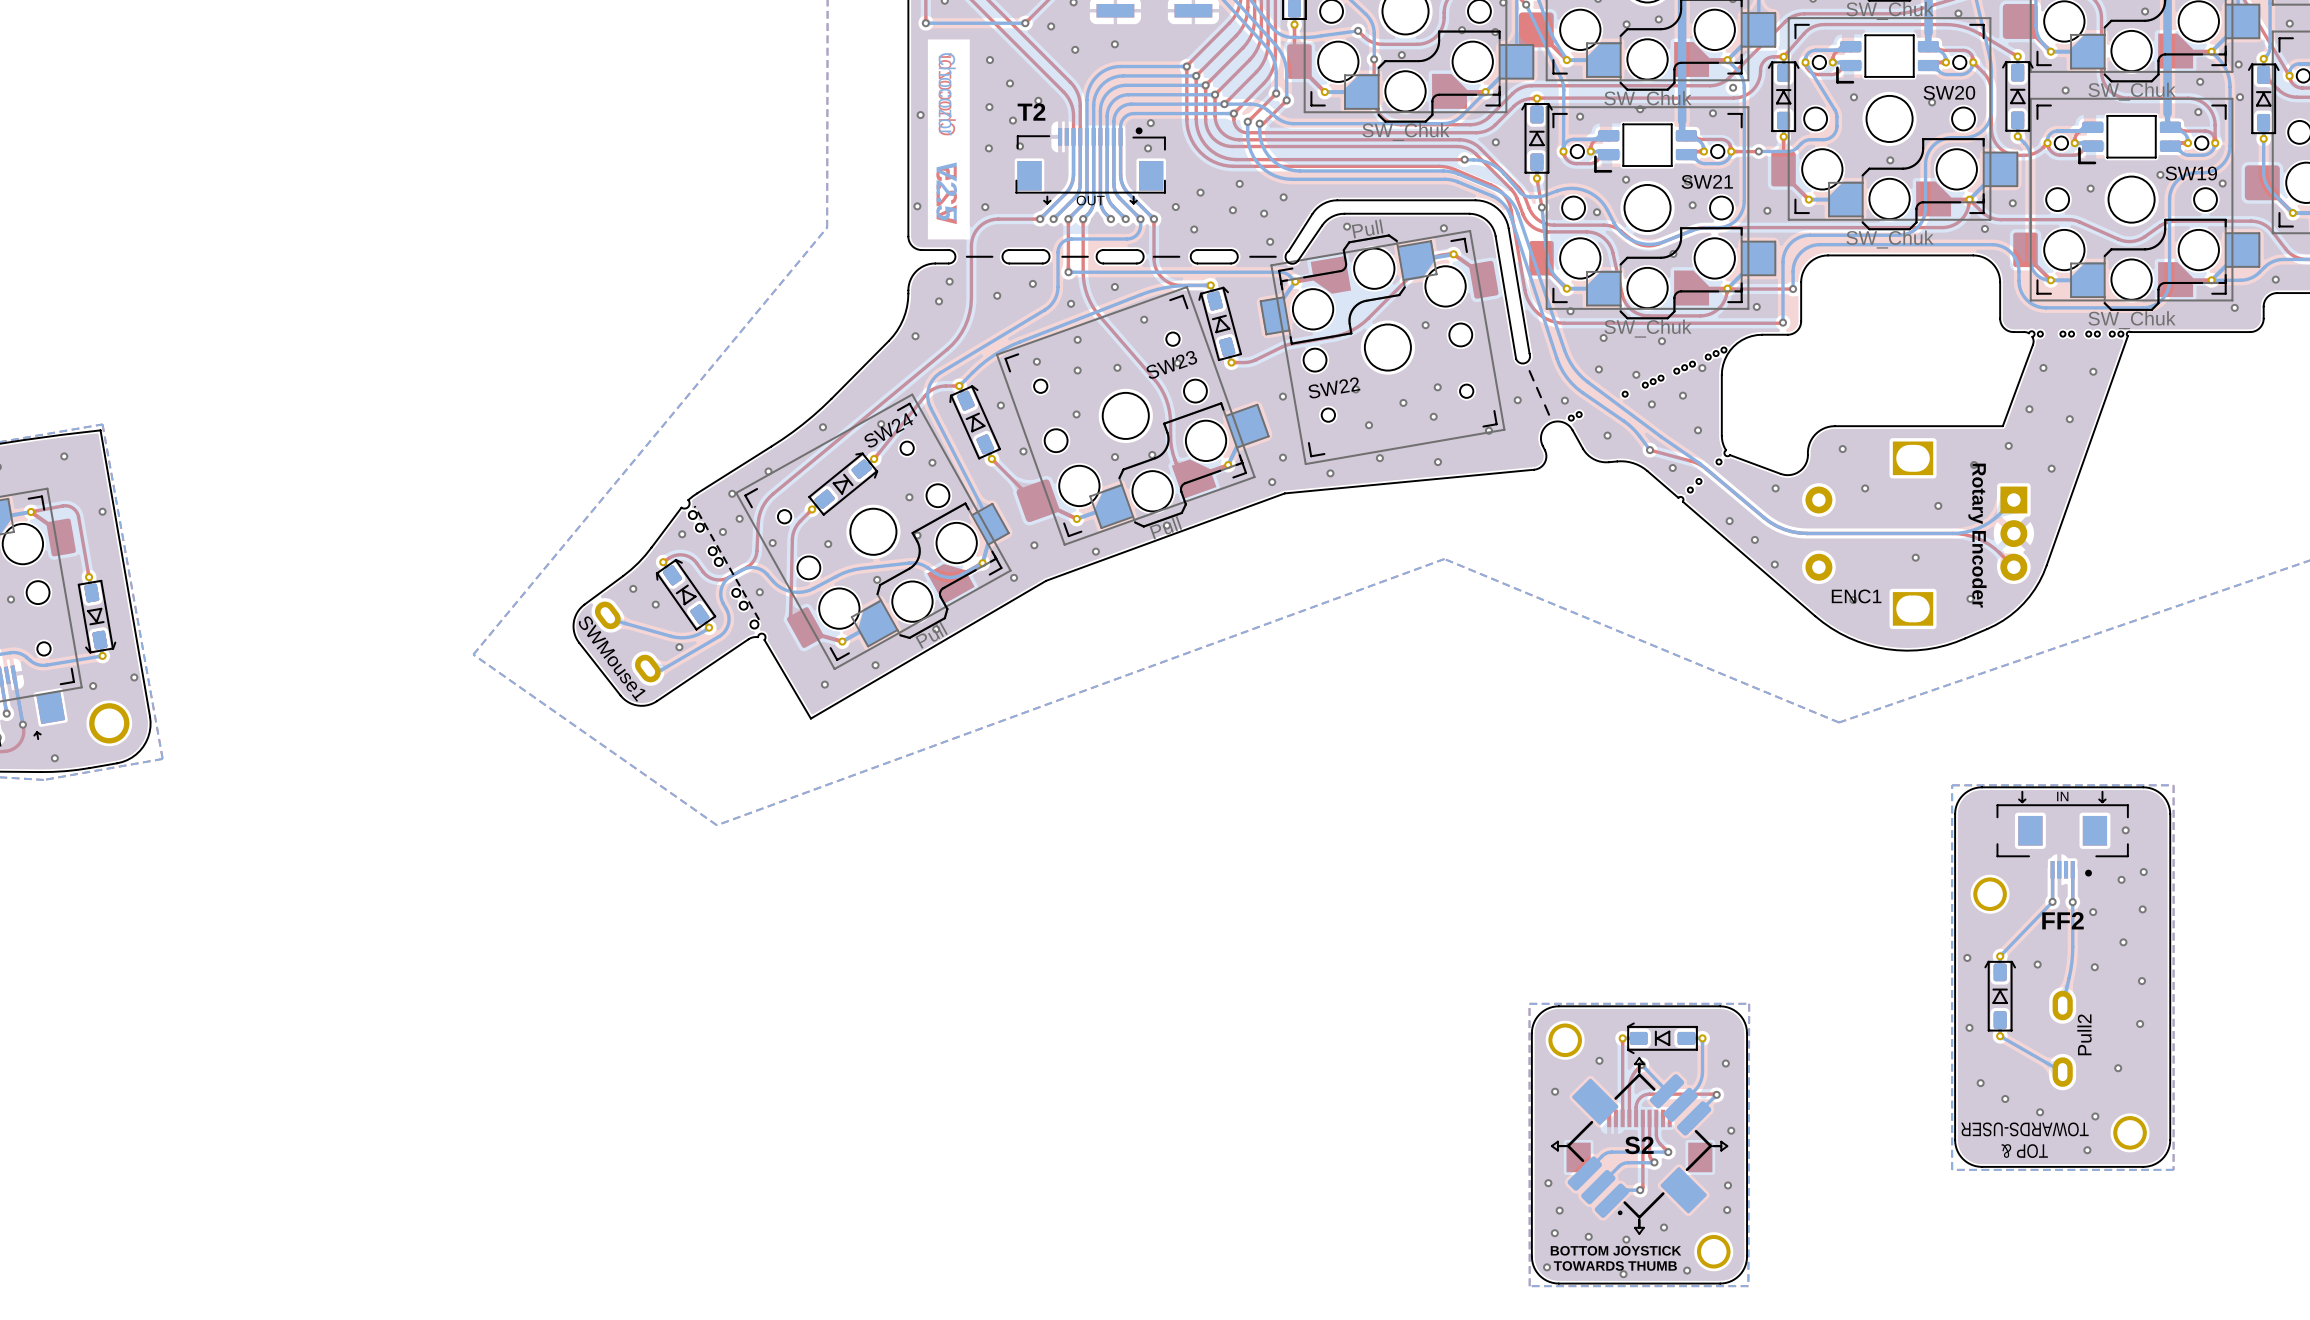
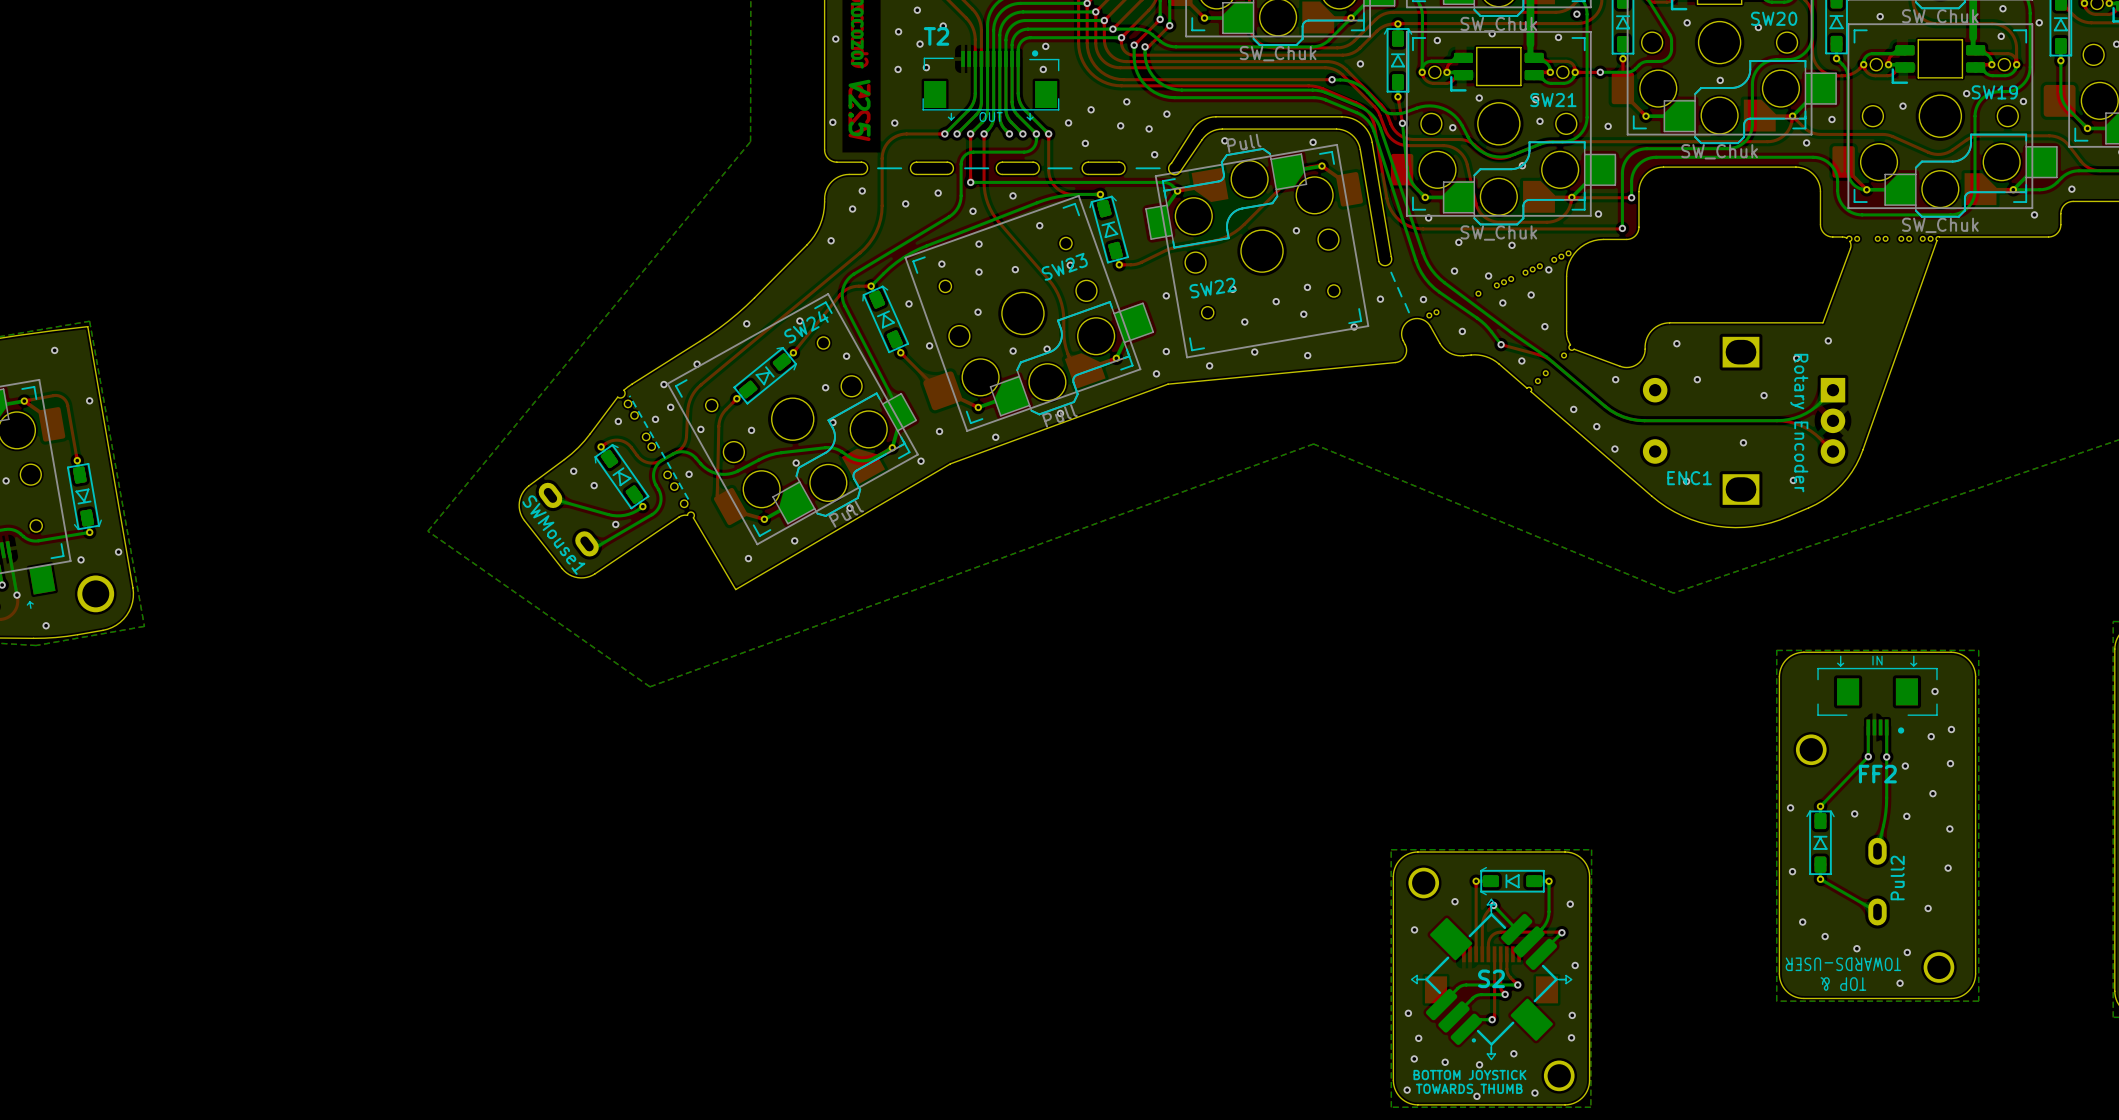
via: (2043, 367) -> none
via: (2093, 371) -> none
via: (2029, 409) -> none
via: (2069, 419) -> none
via: (2051, 468) -> none

